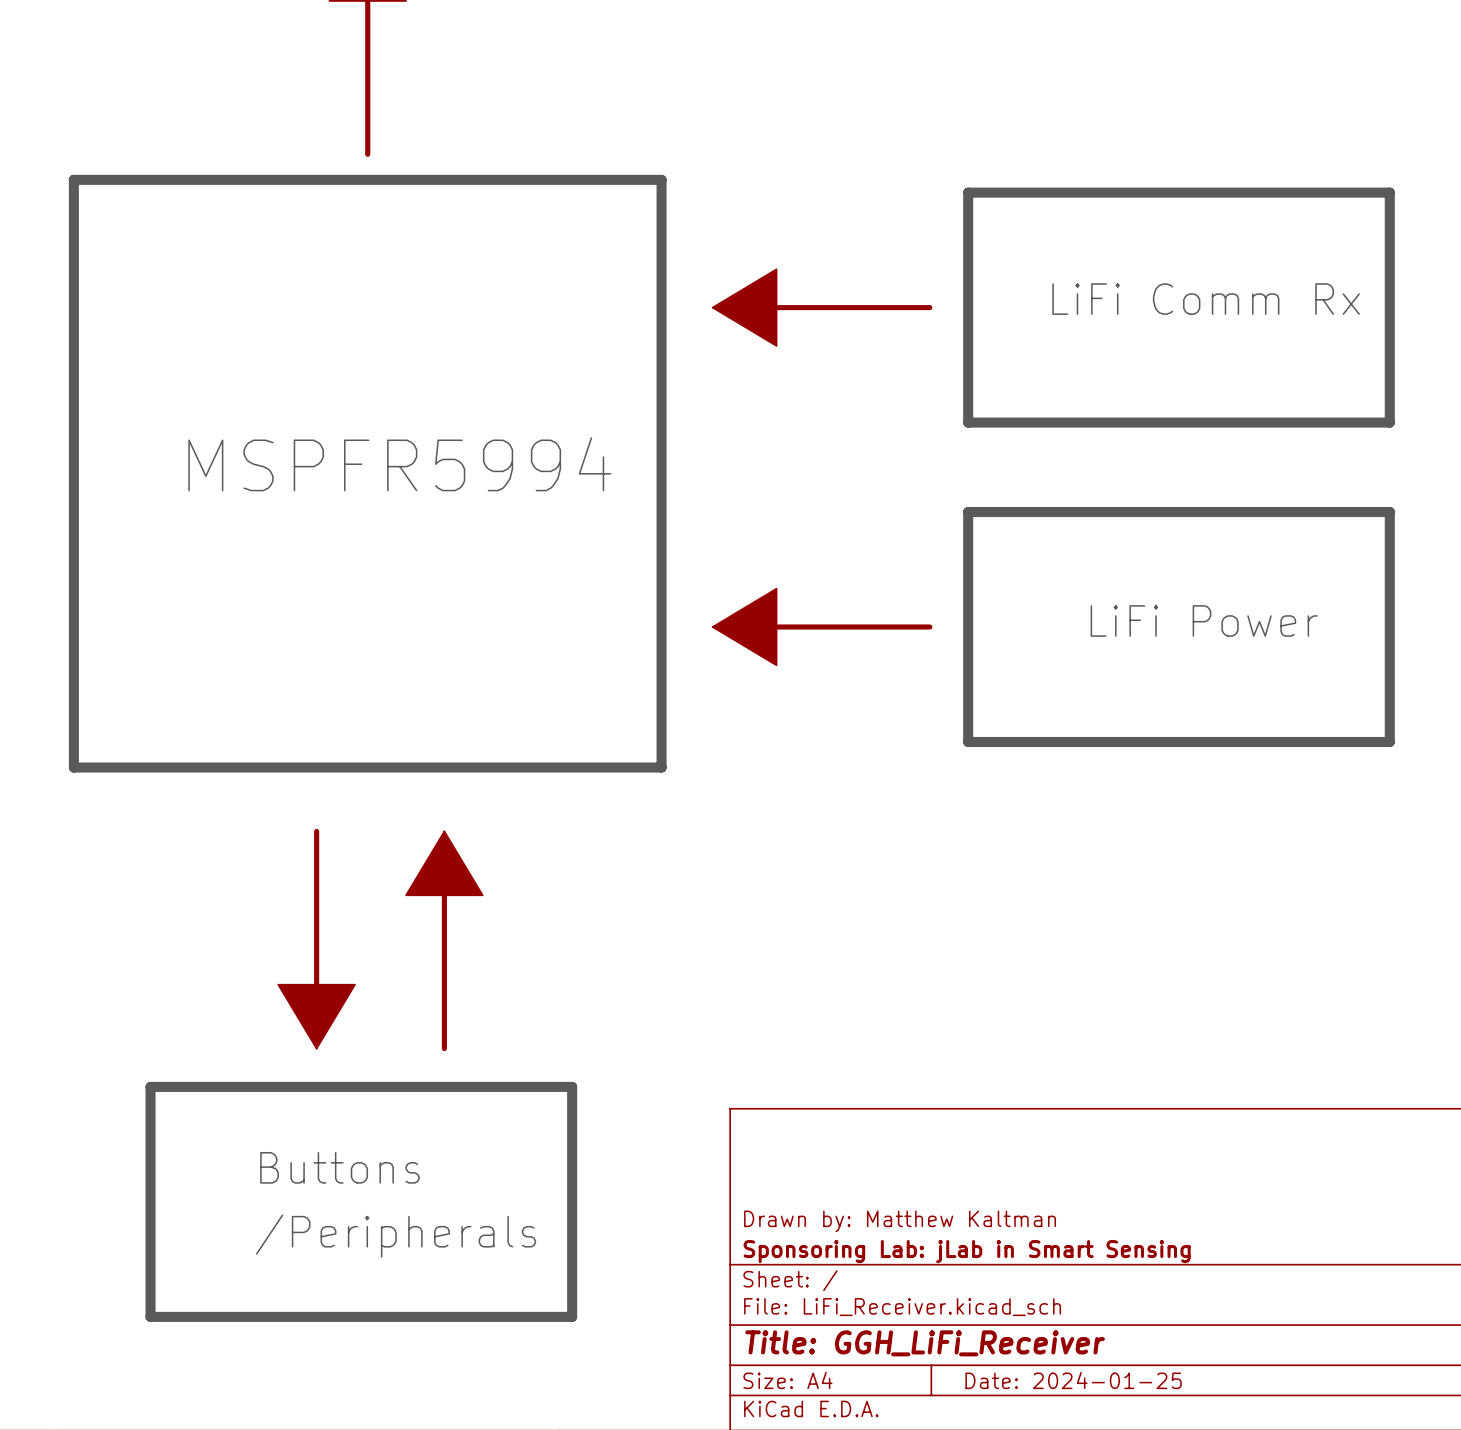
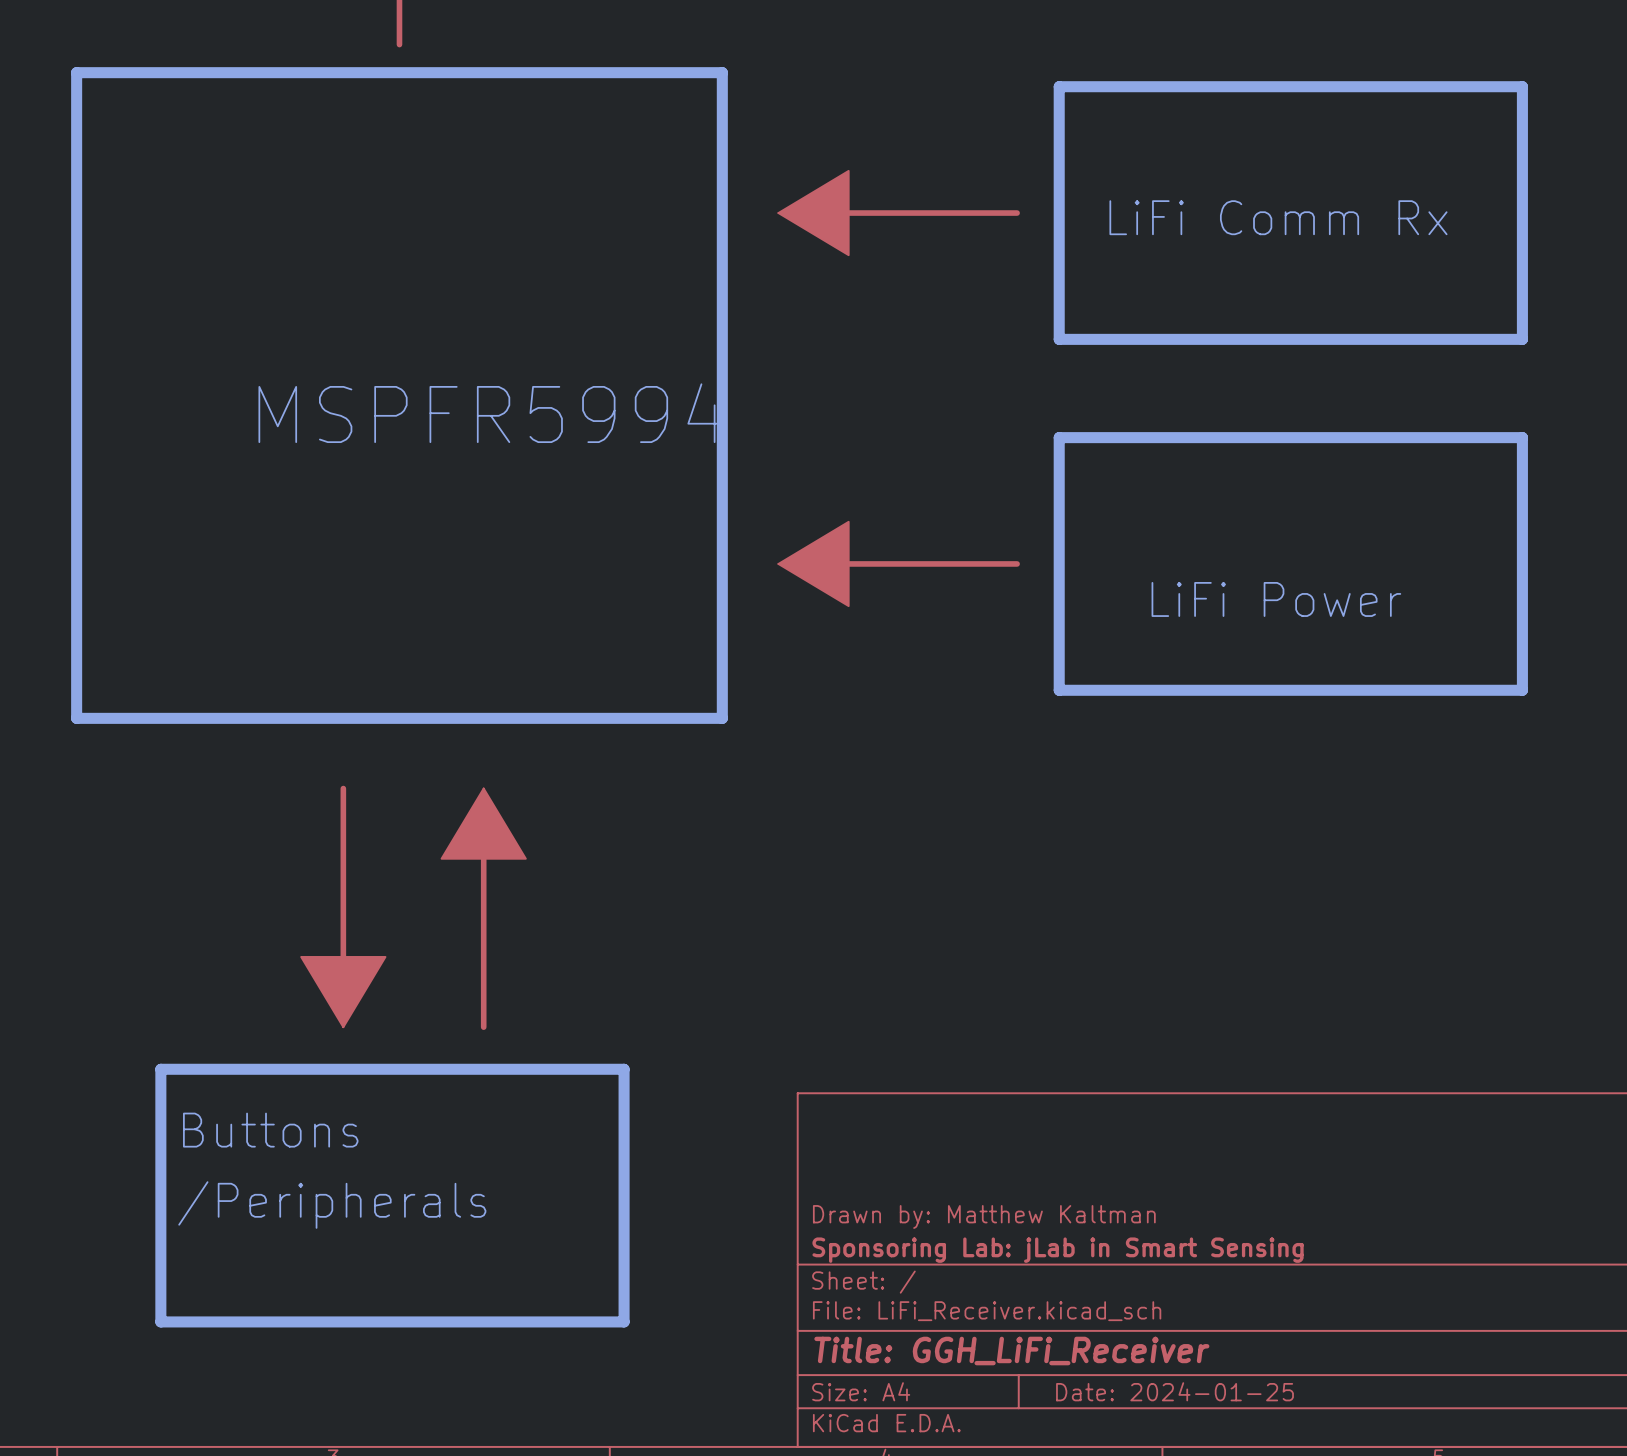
text position: LiFi Comm Rx (1206, 299) -> LiFi Comm Rx (1278, 217)
text position: MSPFR5994 (399, 464) -> MSPFR5994 (490, 413)
text position: LiFi Power (1204, 620) -> LiFi Power (1276, 599)
text position: Buttons (339, 1167) -> Buttons (270, 1130)
text position: /Peripherals (396, 1236) -> /Peripherals (332, 1205)

